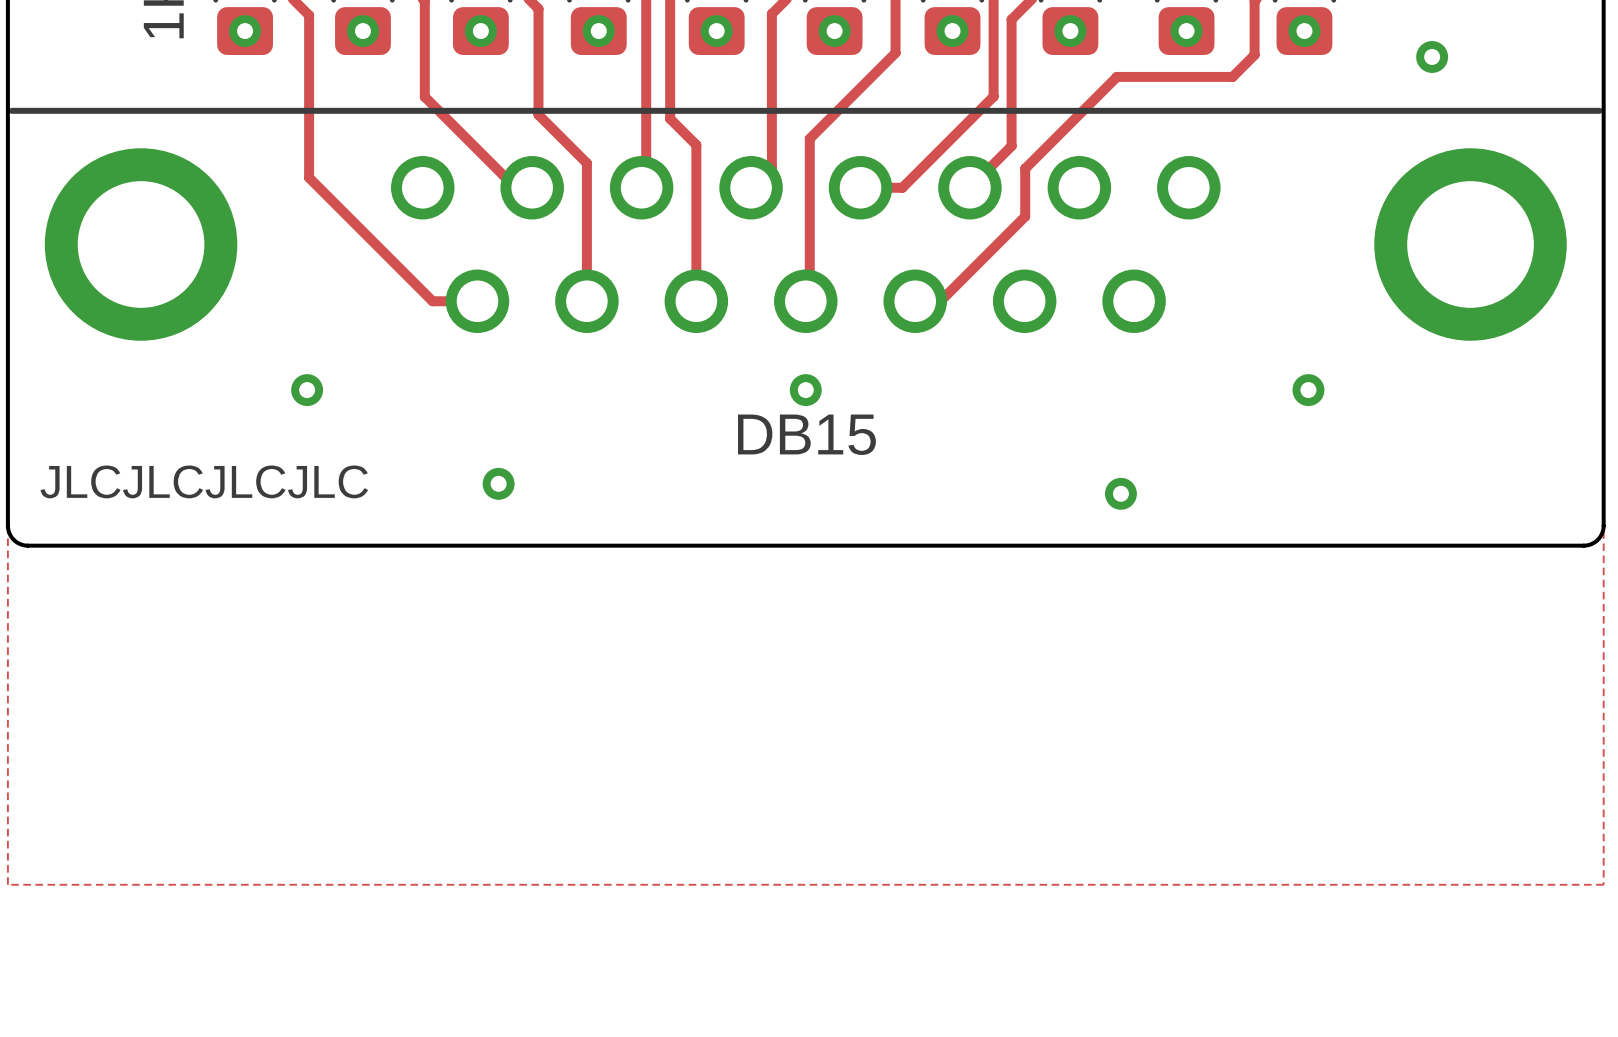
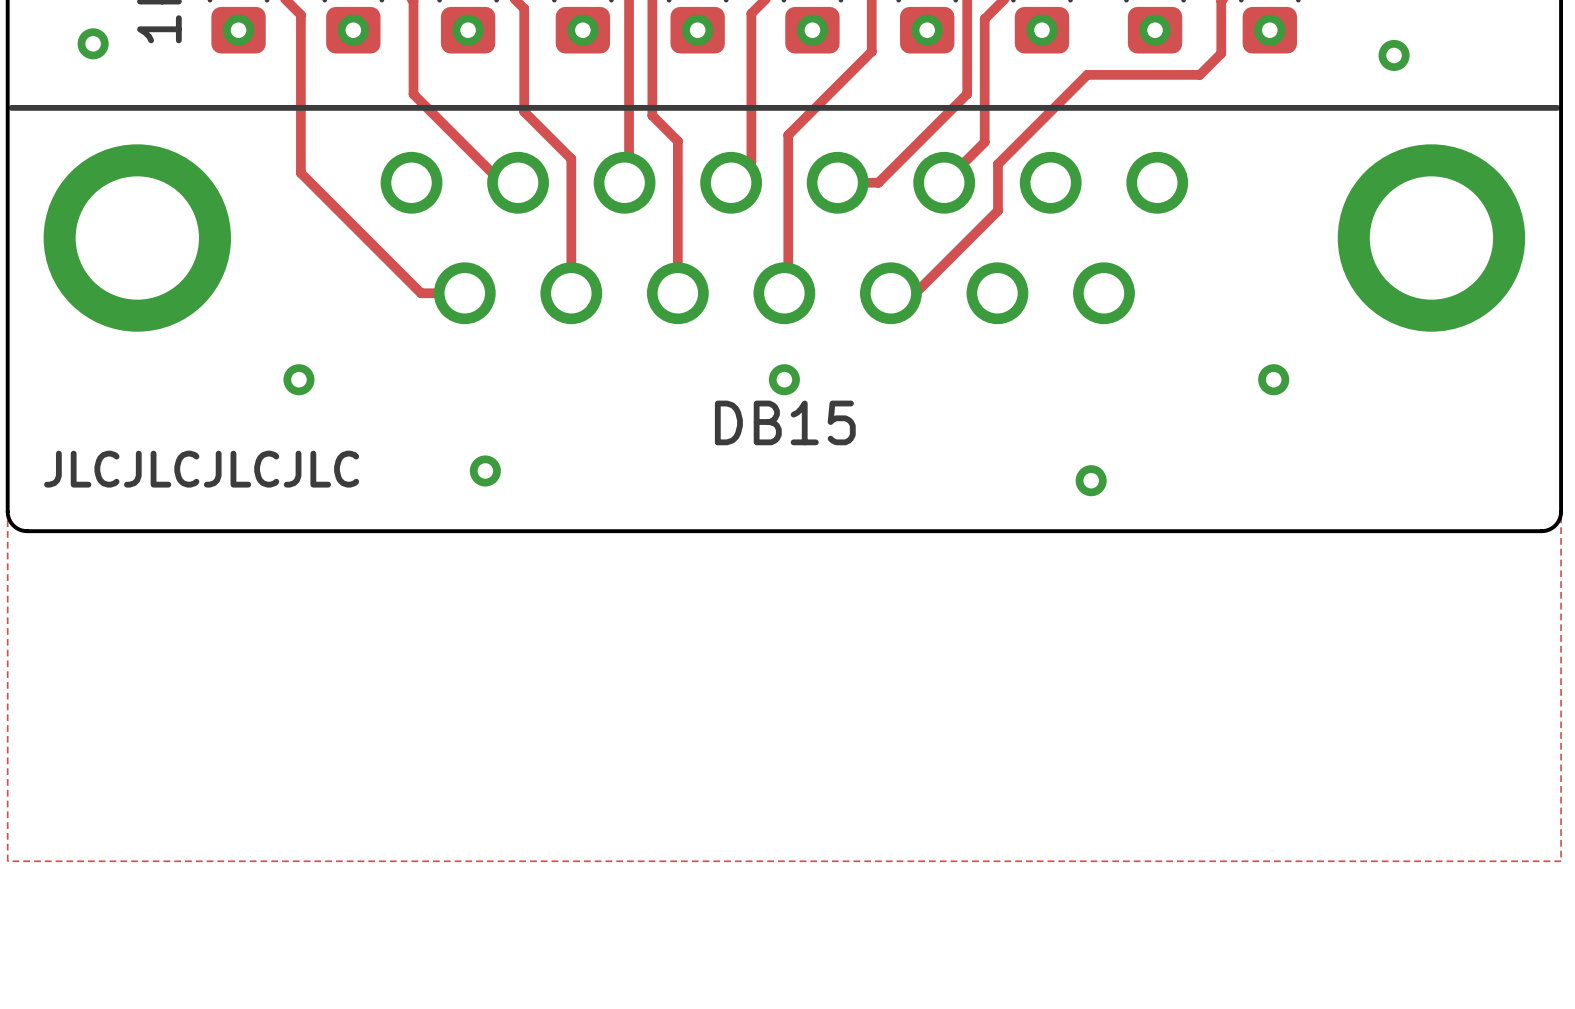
via: none -> (93, 43)

